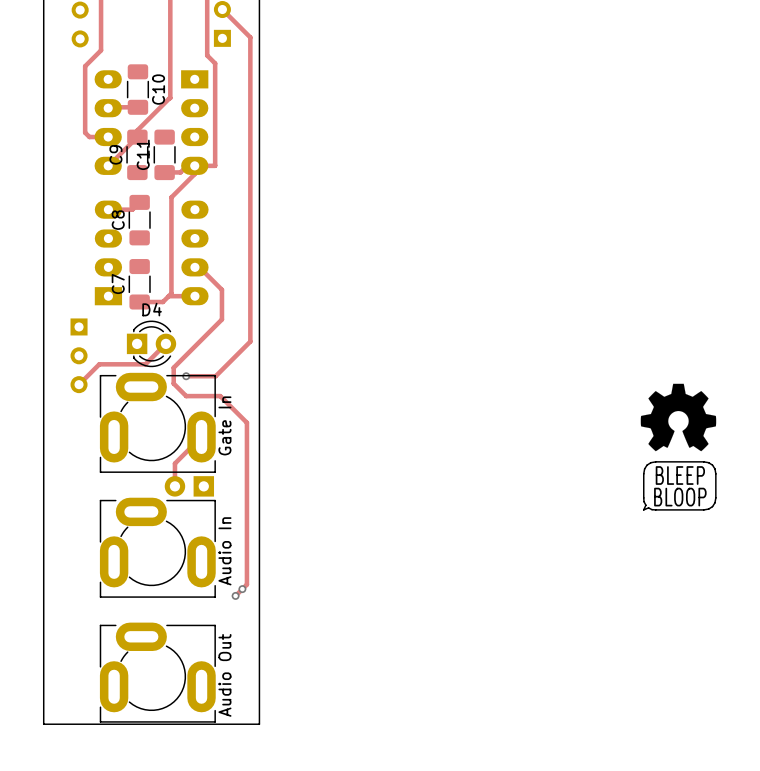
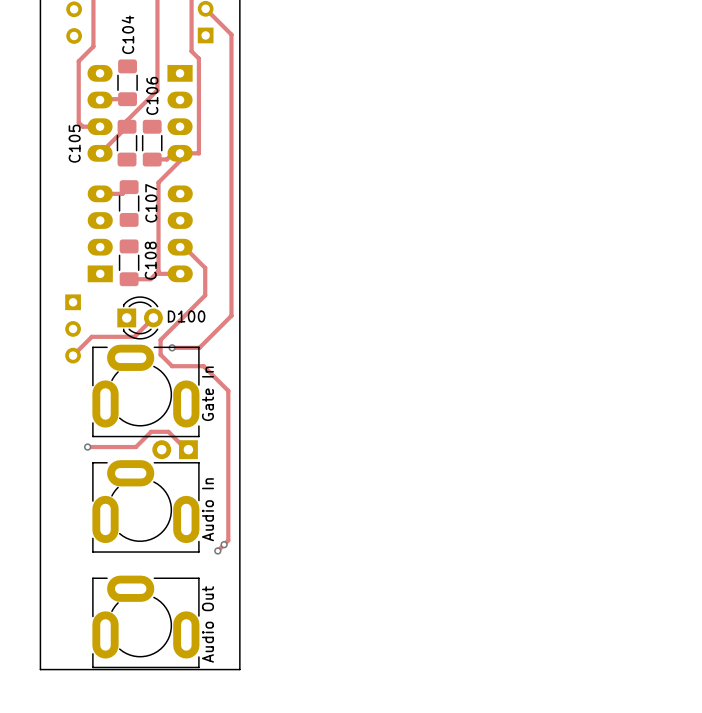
C10 name: C10 (158, 89) -> C104 (127, 34)
C9 name: C9 (115, 154) -> C105 (74, 143)
C11 name: C11 (143, 154) -> C106 (152, 95)
C8 name: C8 (118, 220) -> C107 (151, 203)
C7 name: C7 (118, 284) -> C108 (150, 260)
D4 name: D4 (152, 309) -> D100 (186, 316)
drawing: [640, 383, 717, 511] -> none
track: (201, 436) (174, 463) (174, 486) -> none
track: none -> (87, 447) (135, 447) (151, 431) (168, 431) (188, 449)
via: none -> (87, 447)

